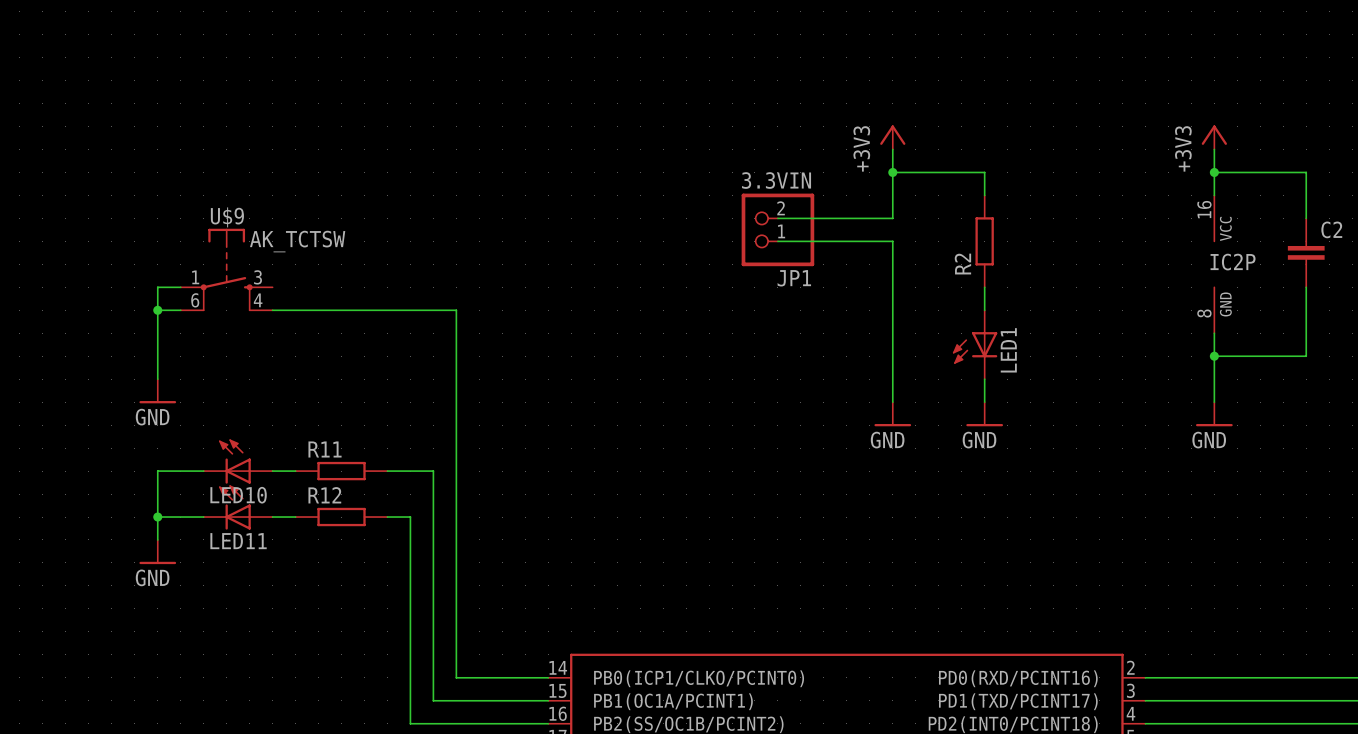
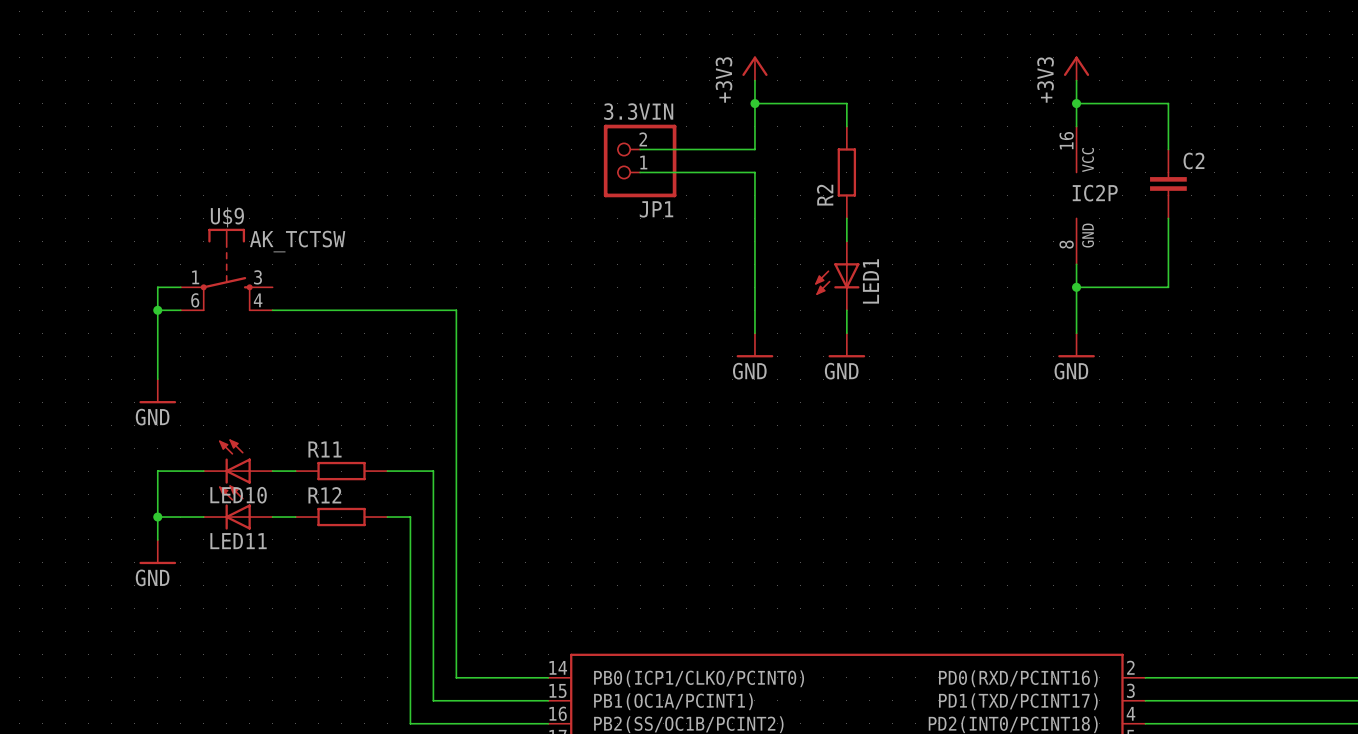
power symbol: none -> +3V3 (754, 68)
power symbol: none -> +3V3 (1076, 68)
junction: none -> (754, 103)
junction: none -> (1076, 103)
power symbol: +3V3 (892, 137) -> none
power symbol: +3V3 (1214, 137) -> none
wire: (892, 149) (892, 218) (777, 218) -> (754, 80) (754, 149) (640, 149)
wire: (1214, 149) (1214, 195) -> (1076, 80) (1076, 126)
wire: (892, 172) (984, 172) (984, 195) -> (754, 103) (846, 103) (846, 126)
junction: (892, 172) -> none
wire: (1214, 172) (1306, 172) (1306, 218) -> (1076, 103) (1168, 103) (1168, 149)
junction: (1214, 172) -> none
JP1 position: (777, 229) -> (640, 160)
wire: (777, 241) (892, 241) (892, 402) -> (640, 172) (754, 172) (754, 333)
R2 position: (984, 241) -> (846, 172)
C2 position: (1306, 252) -> (1168, 183)
IC2P position: (1214, 264) -> (1076, 195)
wire: (984, 287) (984, 310) -> (846, 218) (846, 241)
junction: none -> (1076, 287)
wire: (1306, 287) (1306, 356) (1214, 356) -> (1168, 218) (1168, 287) (1076, 287)
wire: (1214, 333) (1214, 402) -> (1076, 264) (1076, 333)
LED1 position: (975, 344) -> (837, 275)
power symbol: none -> GND (754, 345)
power symbol: none -> GND (846, 345)
power symbol: none -> GND (1076, 345)
junction: (1214, 356) -> none
wire: (984, 379) (984, 402) -> (846, 310) (846, 333)
power symbol: GND (892, 414) -> none
power symbol: GND (984, 414) -> none
power symbol: GND (1214, 414) -> none

